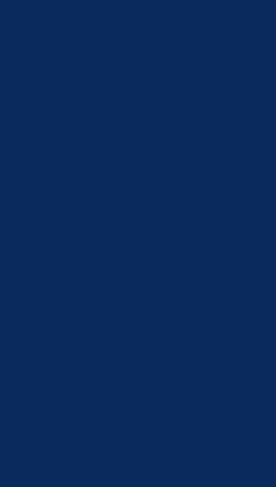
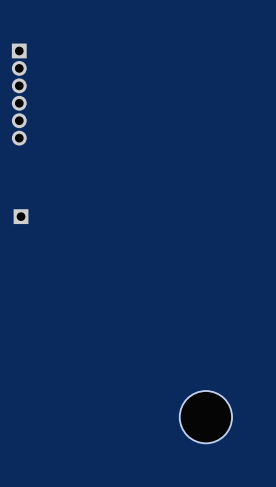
part: none -> (19, 94)
part: none -> (21, 216)
part: none -> (205, 417)

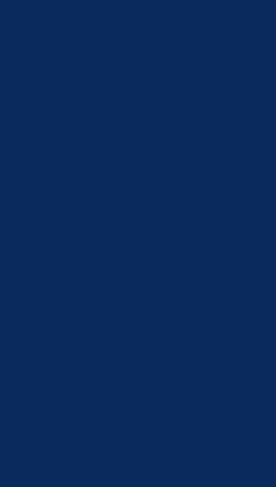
part: (19, 94) -> none
part: (21, 216) -> none
part: (205, 417) -> none

